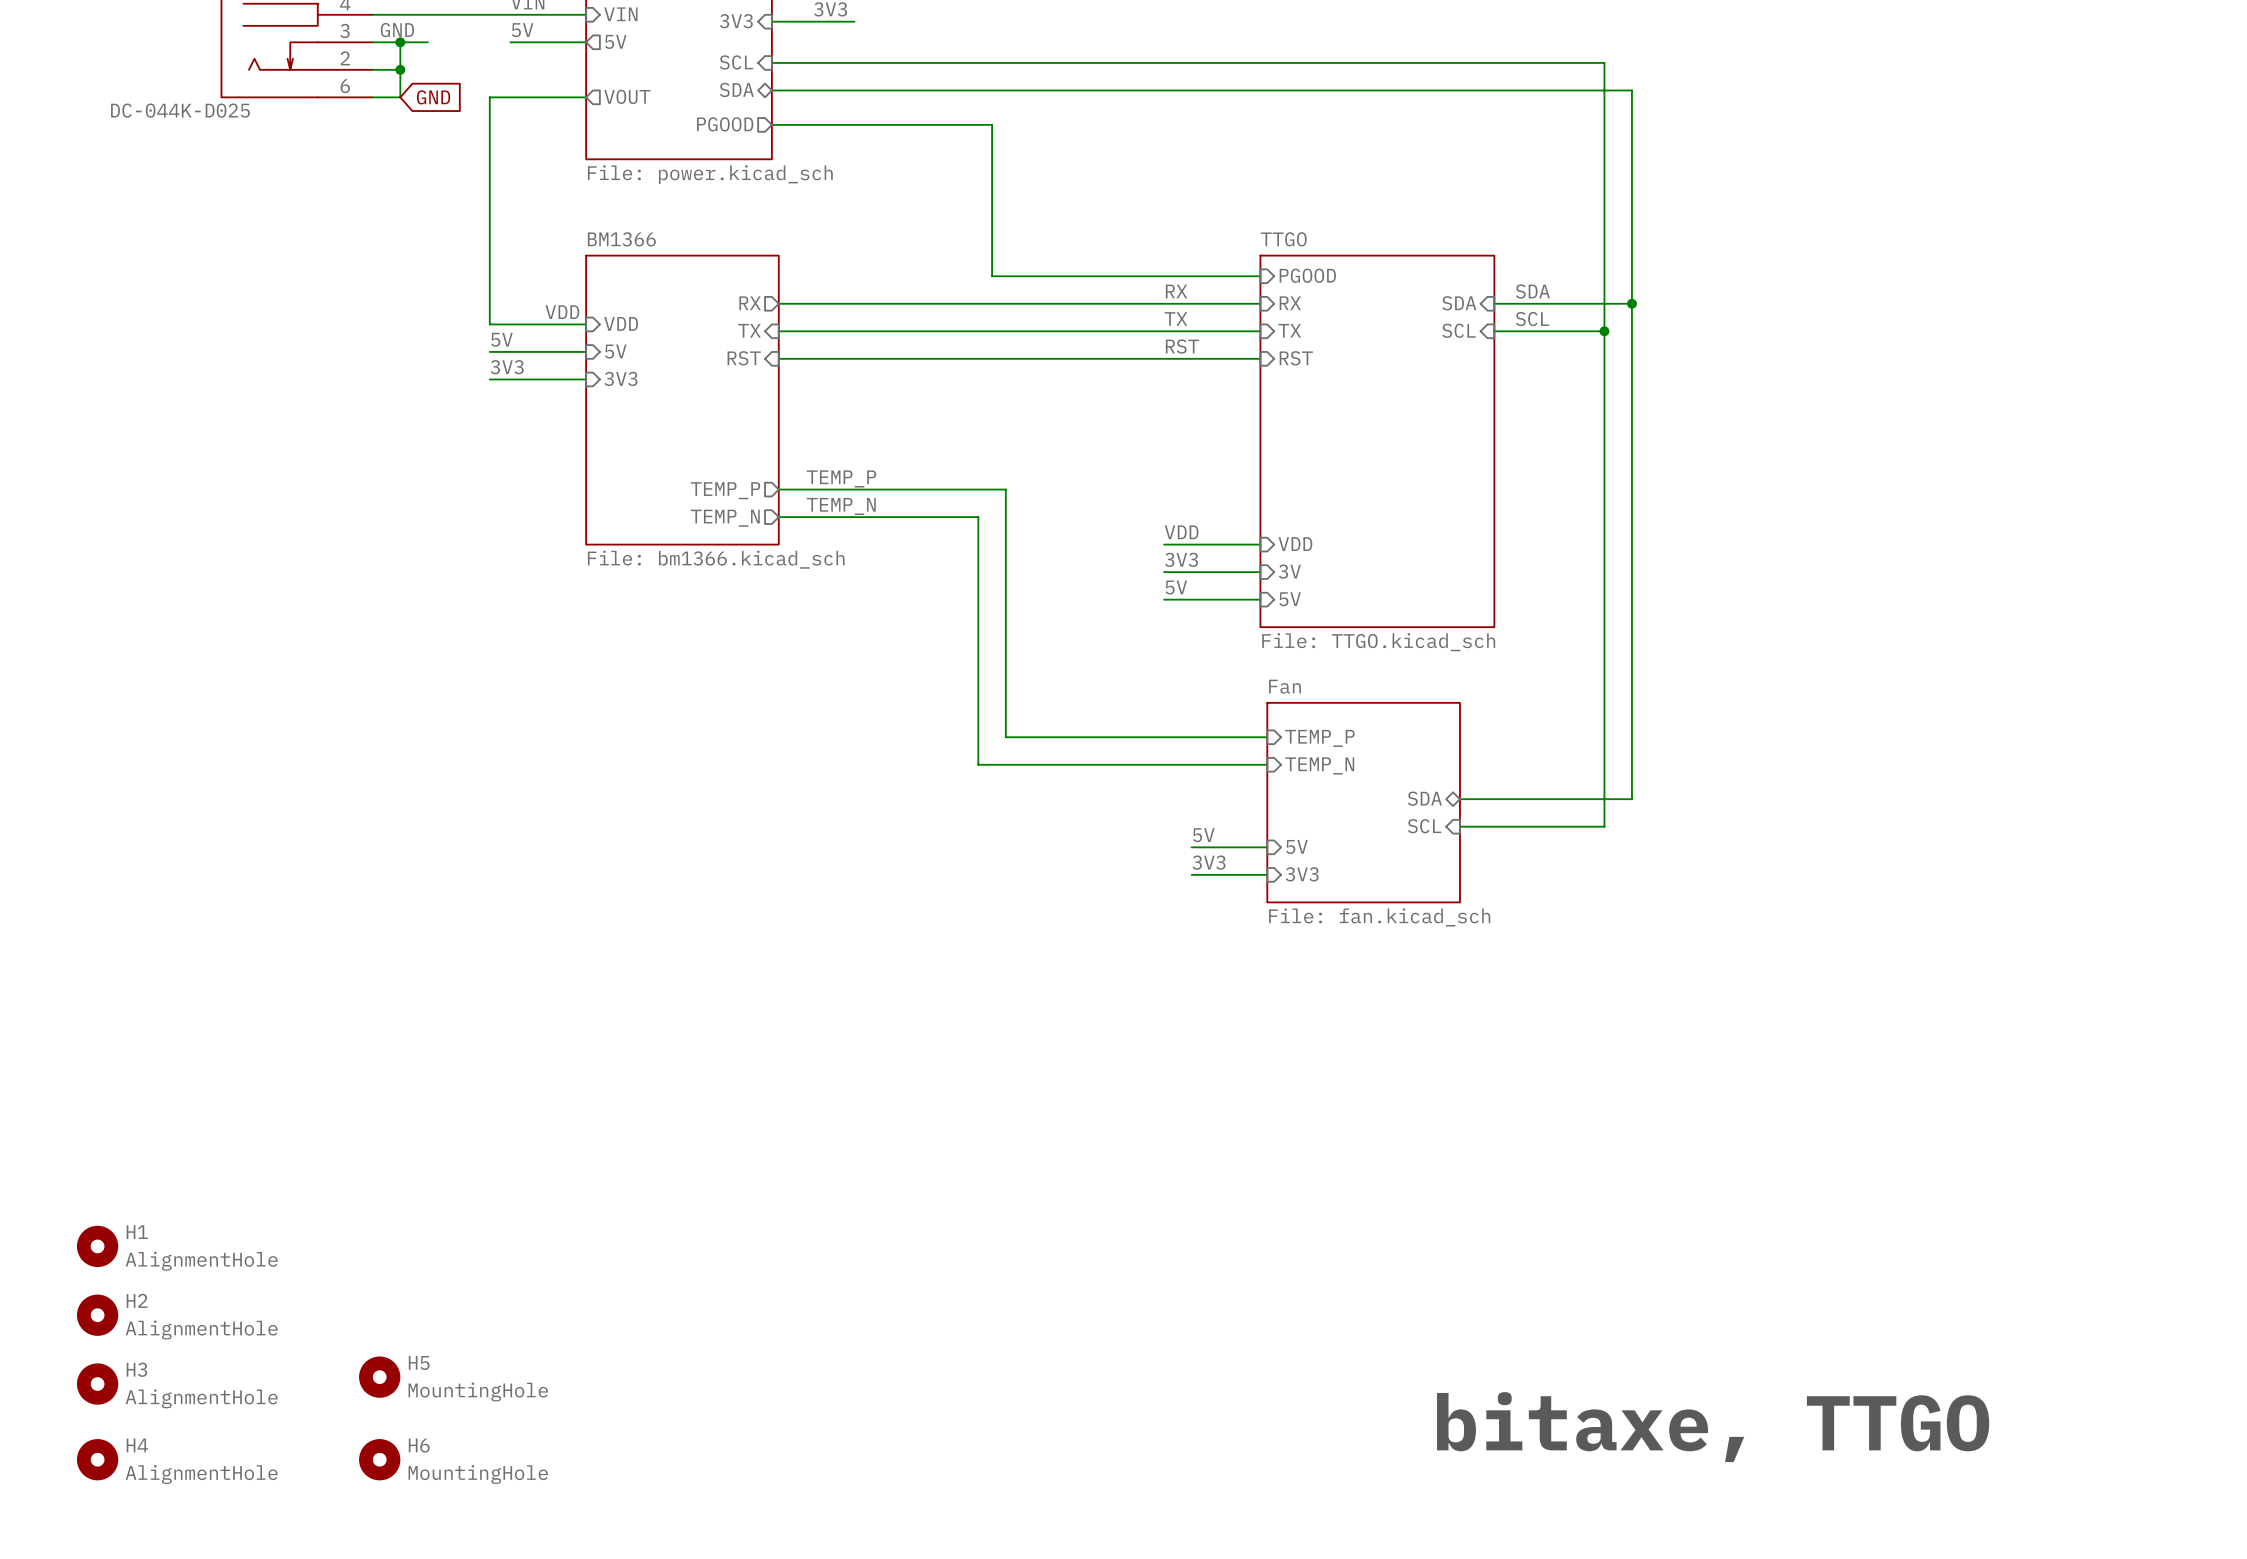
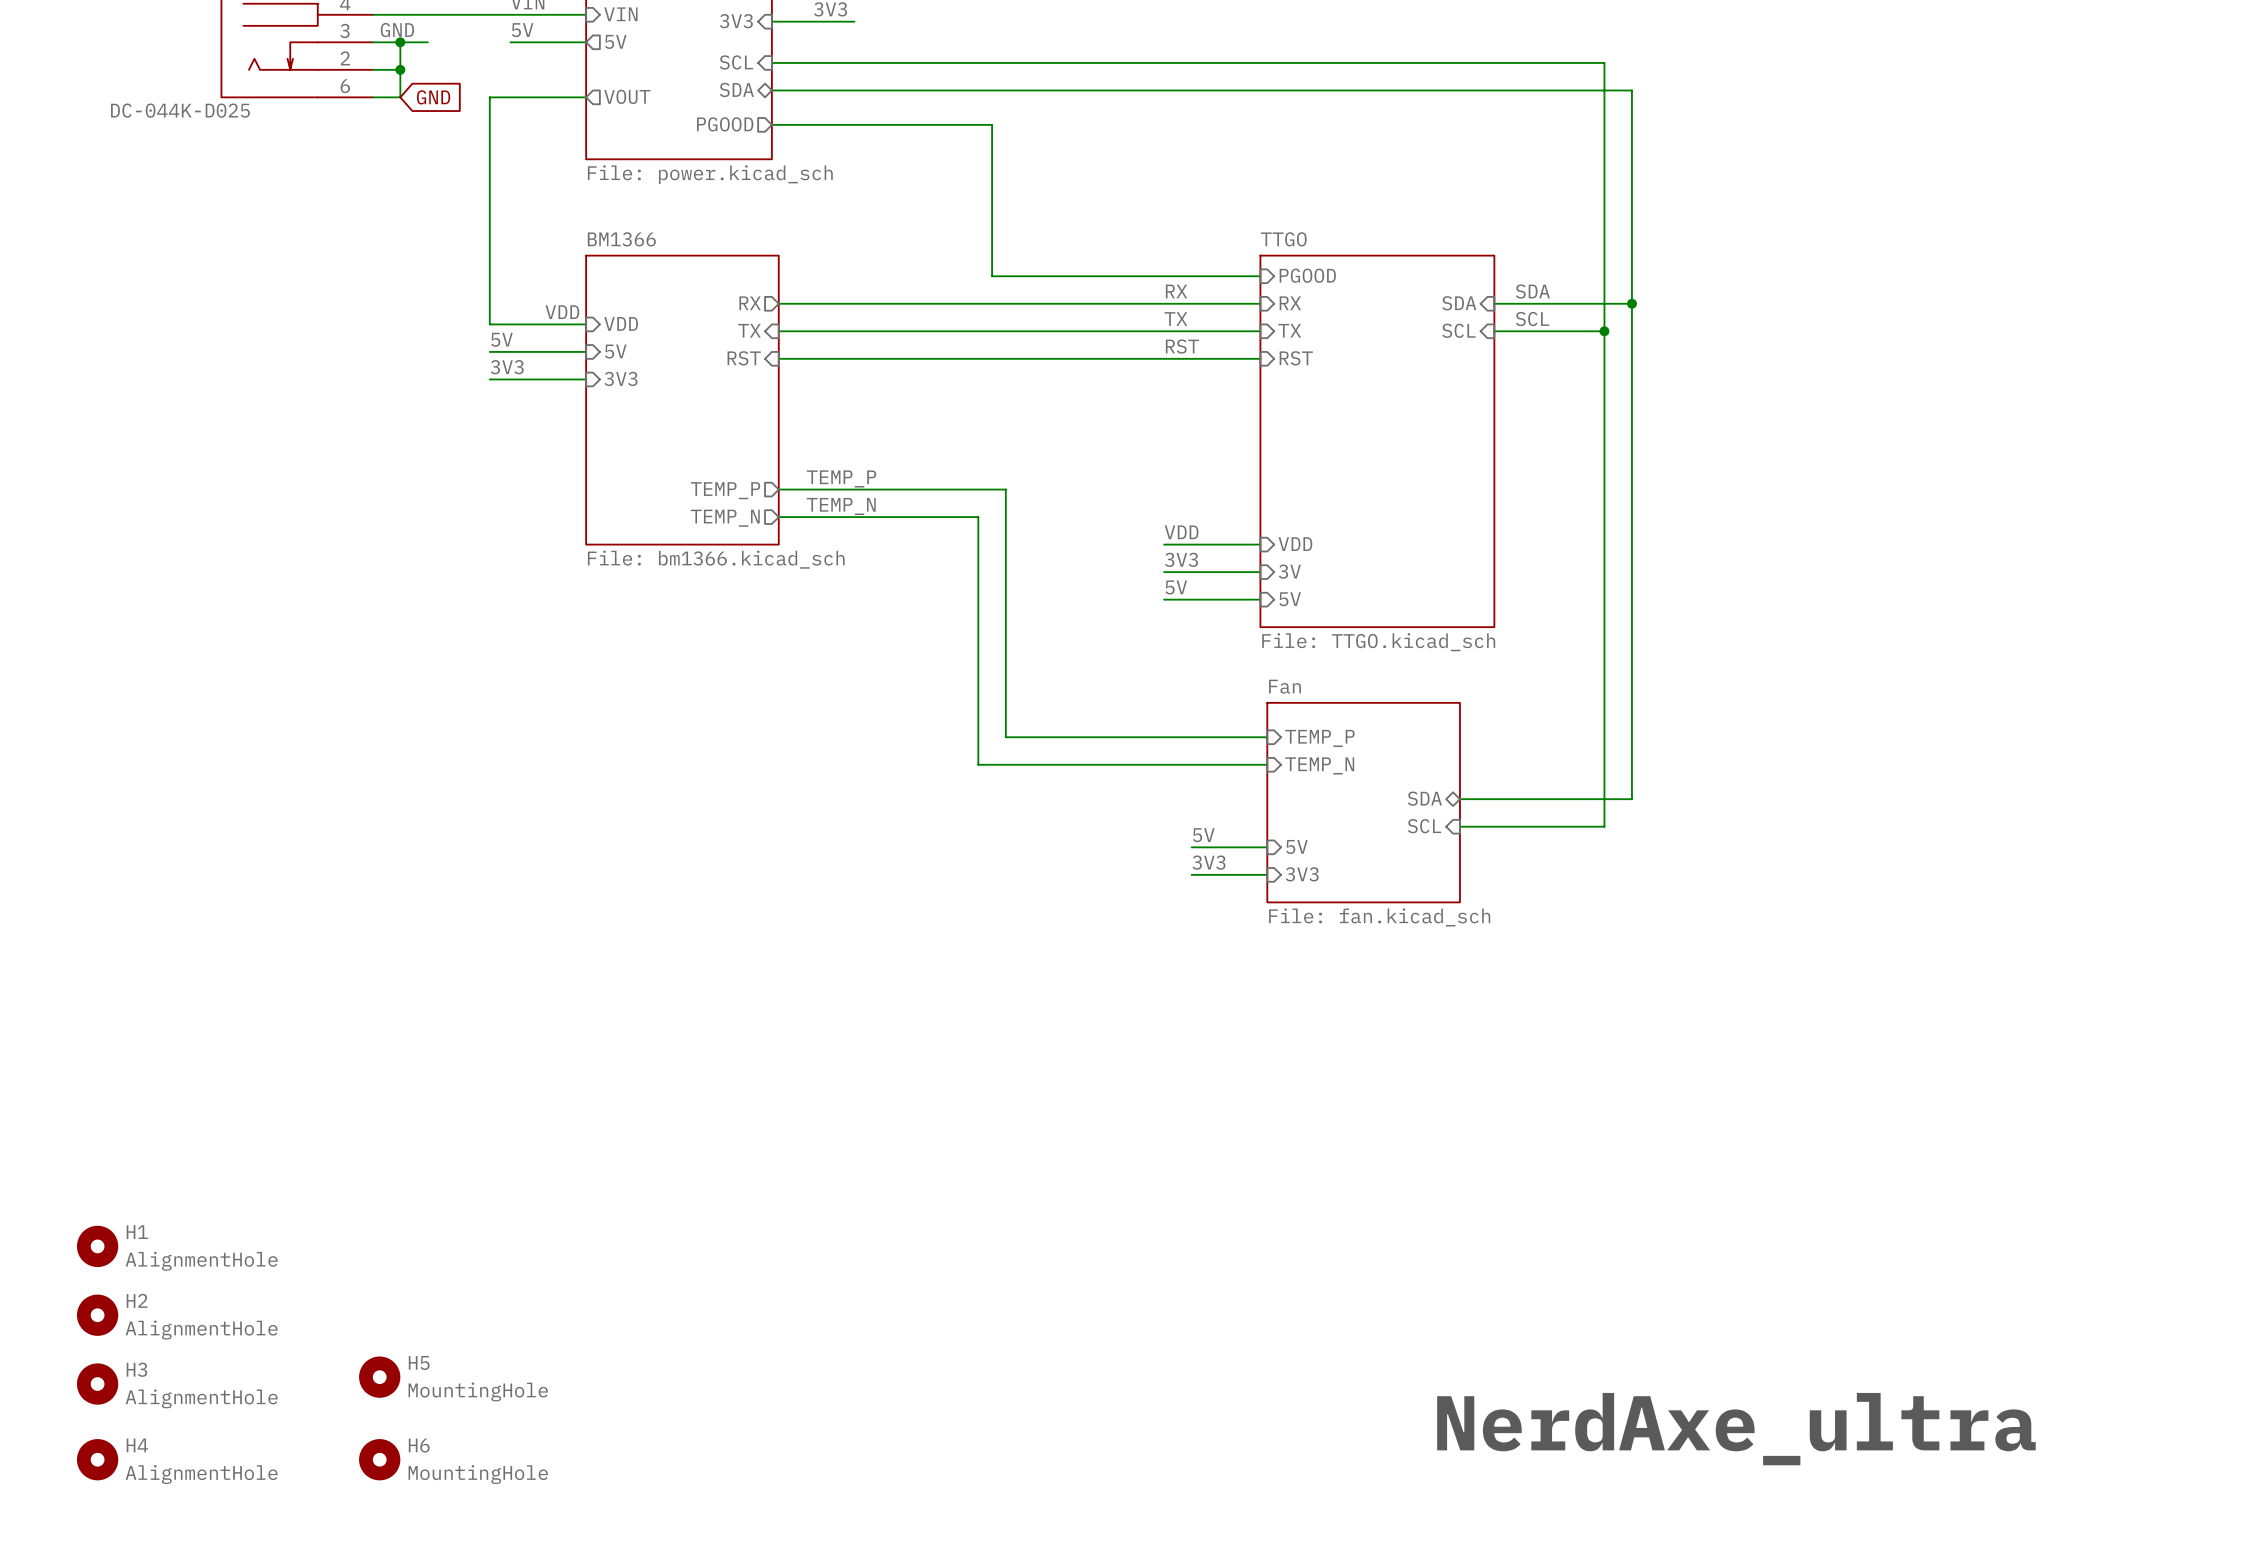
text: bitaxe, TTGO (1713, 1427) -> NerdAxe_ultra (1736, 1429)

